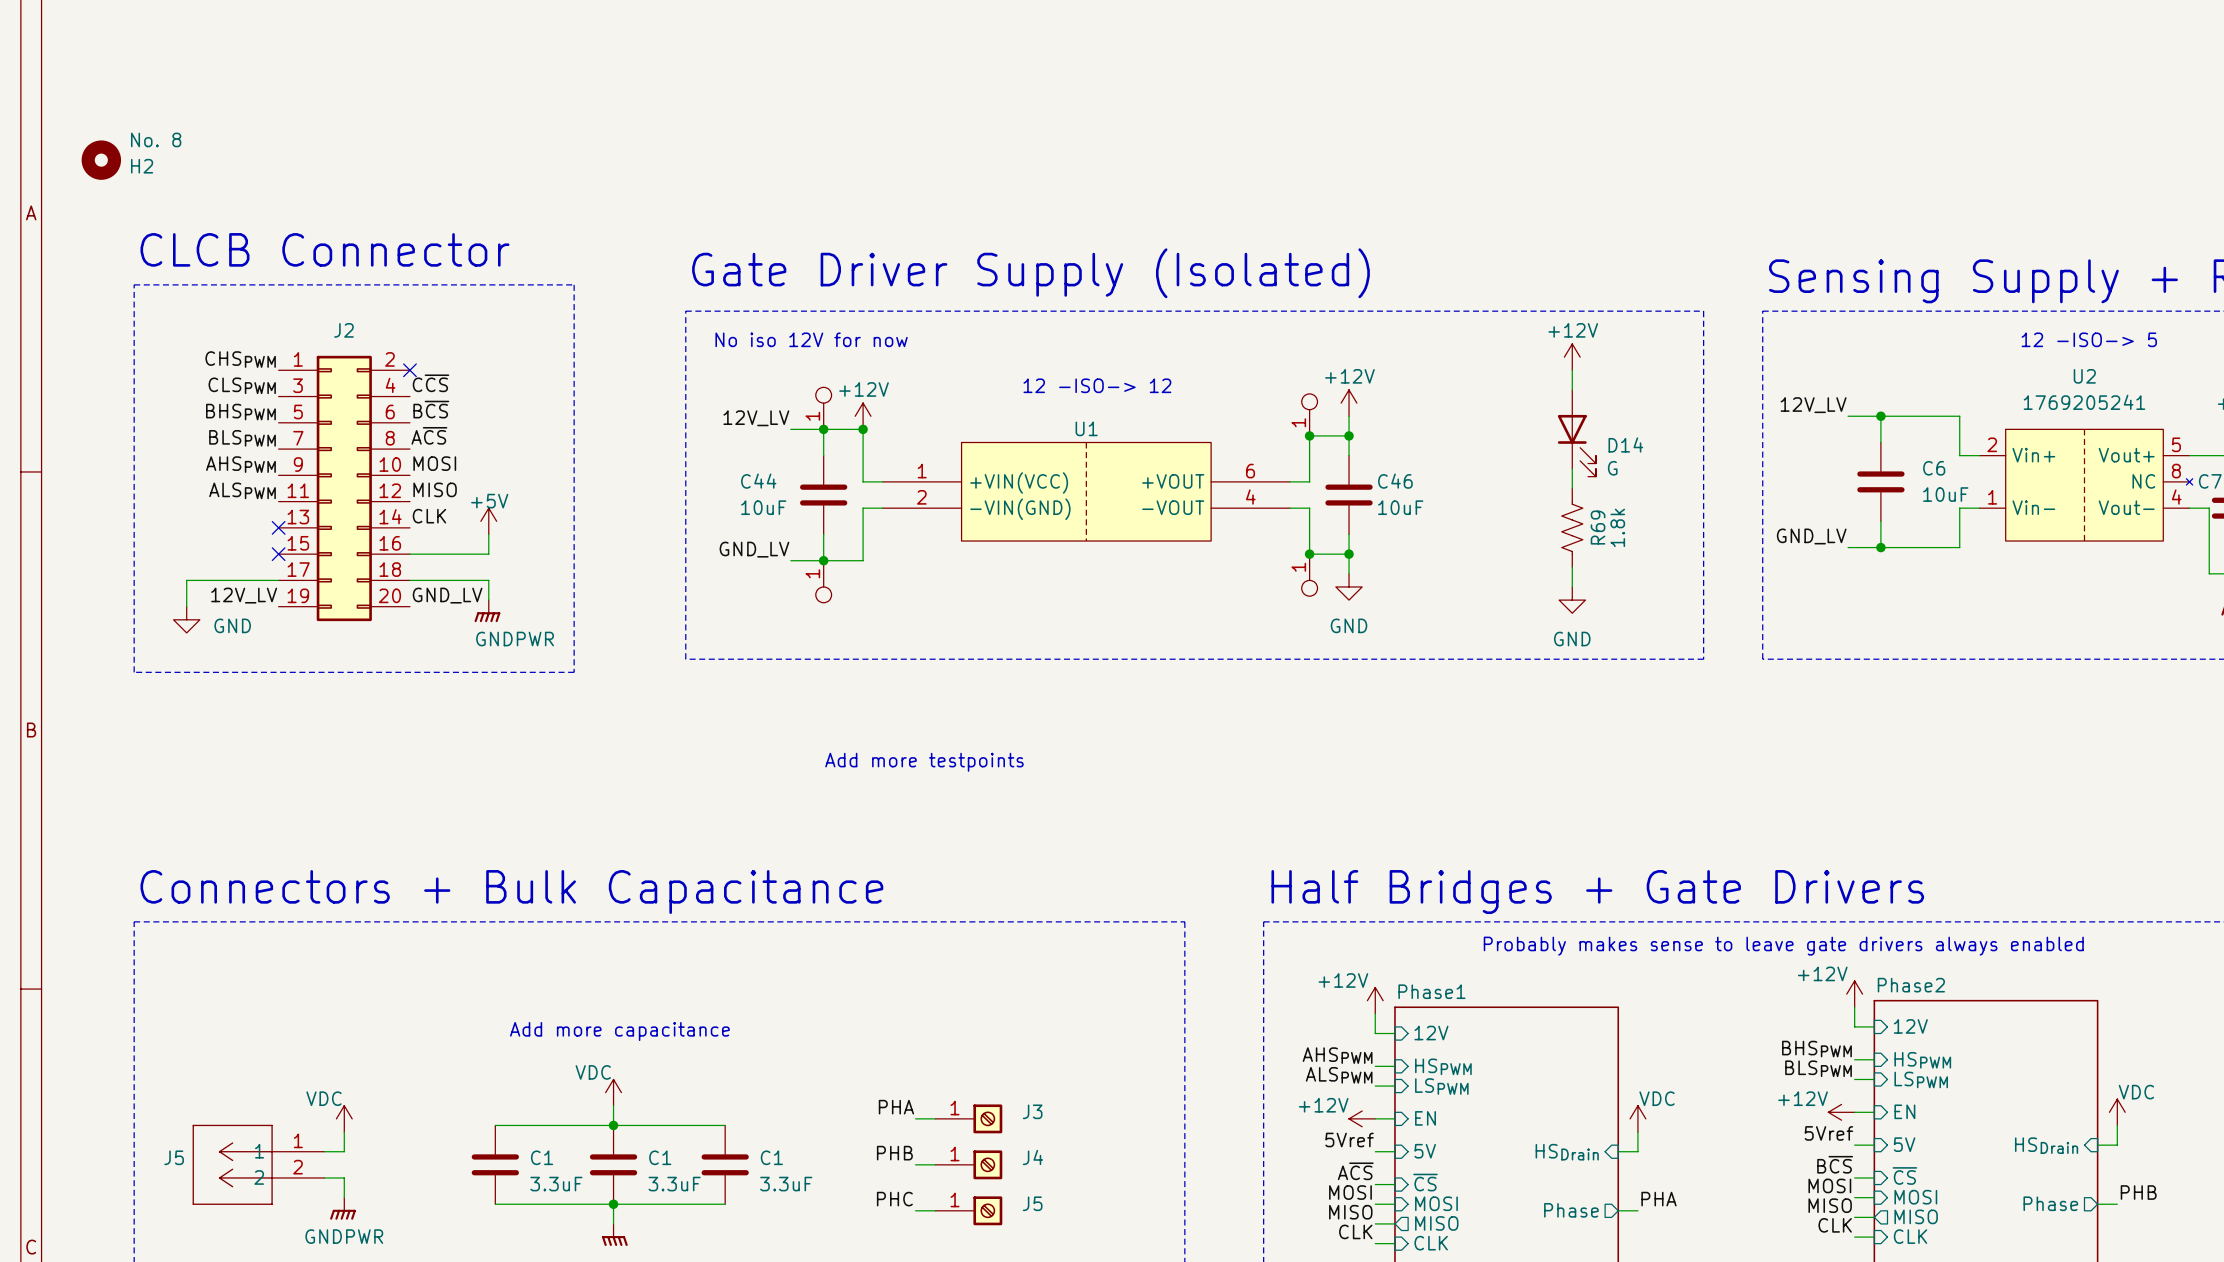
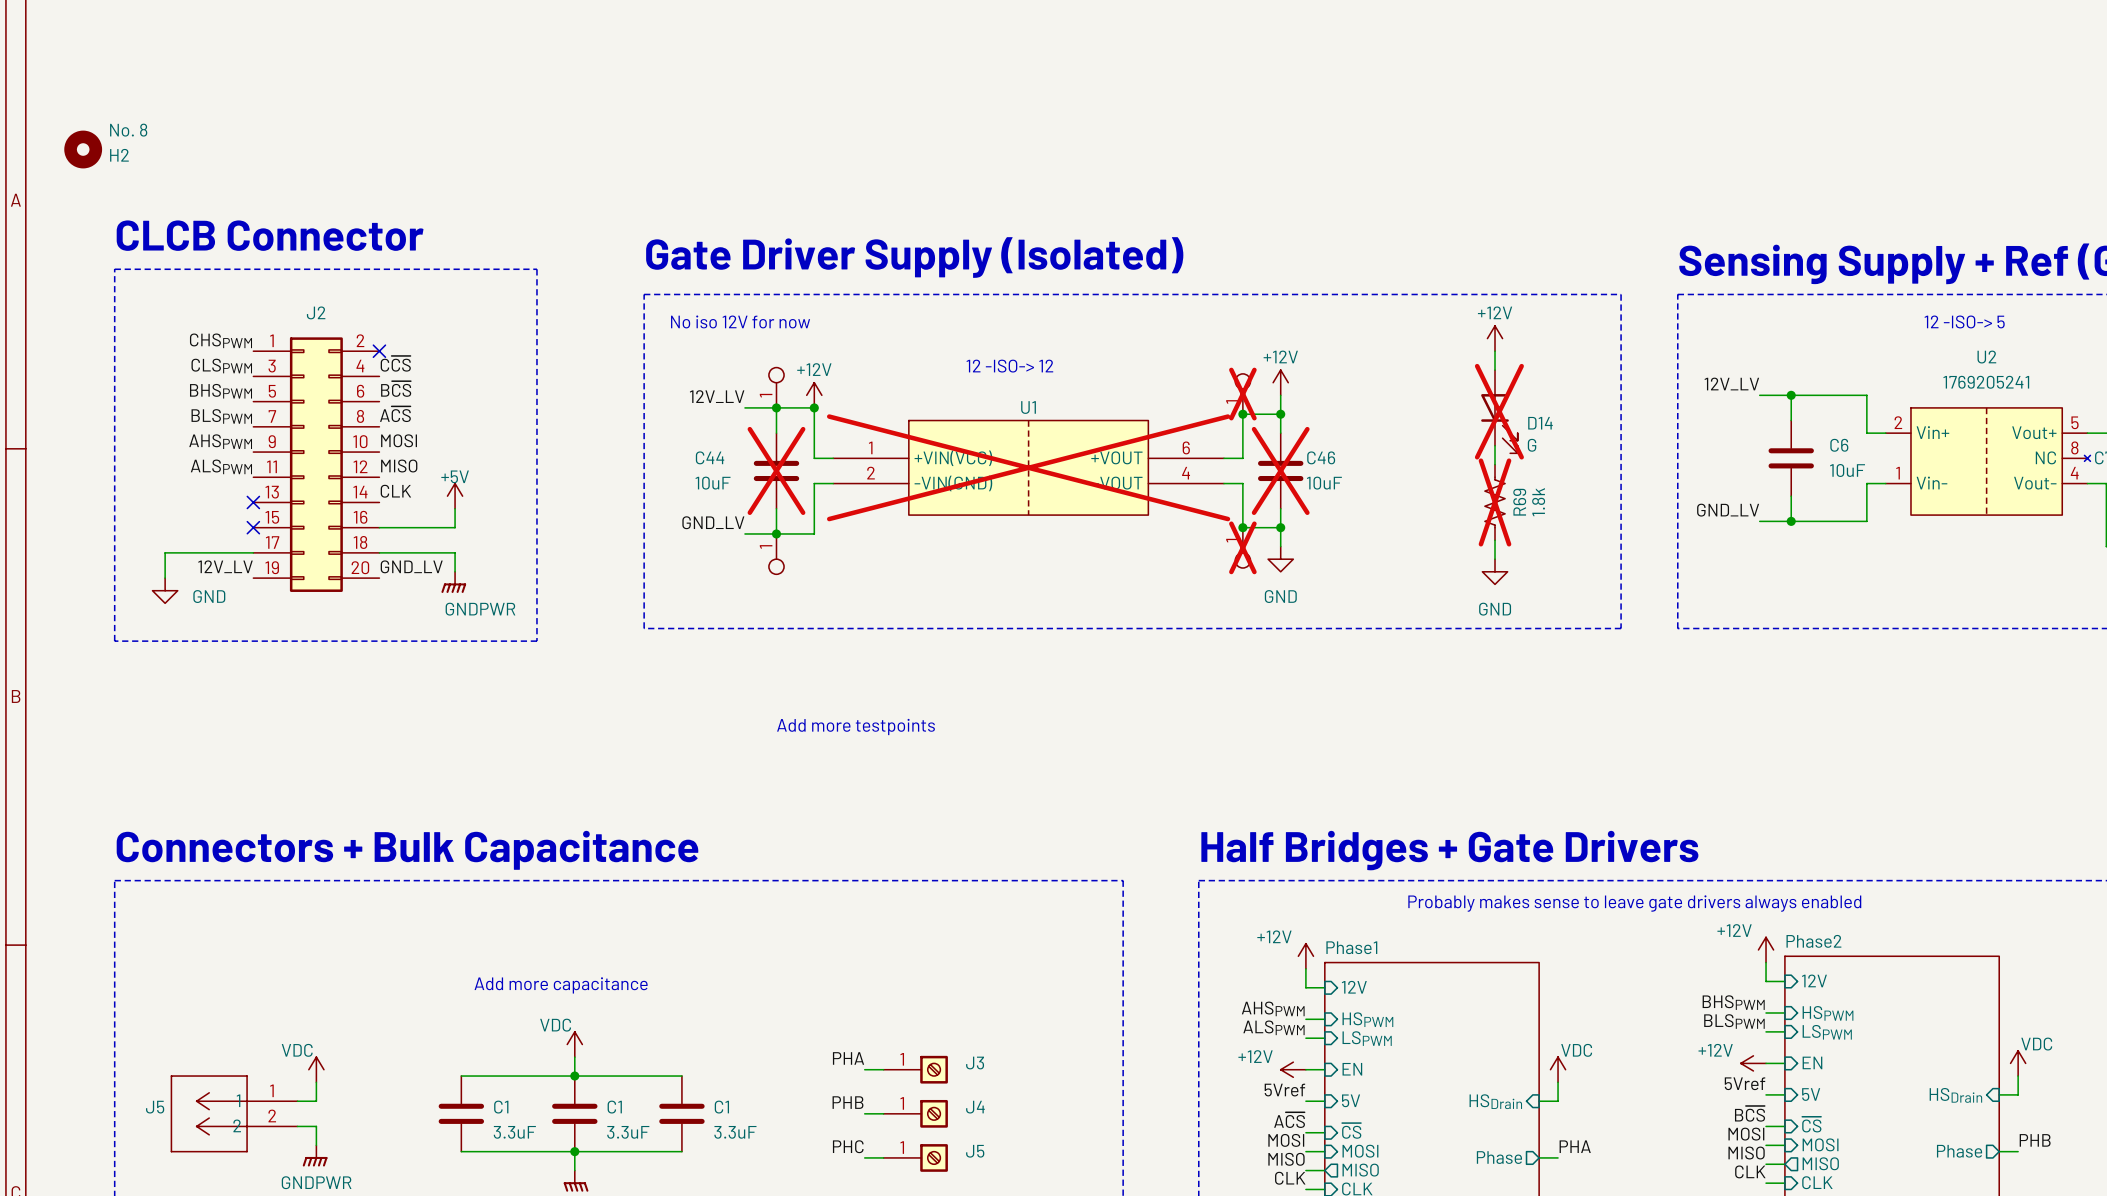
part do-not-place cross: none -> (1242, 394)
D14 do-not-place cross: none -> (1499, 411)
U1 do-not-place cross: none -> (1028, 467)
C44 do-not-place cross: none -> (776, 470)
C46 do-not-place cross: none -> (1280, 470)
R69 do-not-place cross: none -> (1495, 502)
part do-not-place cross: none -> (1242, 547)

